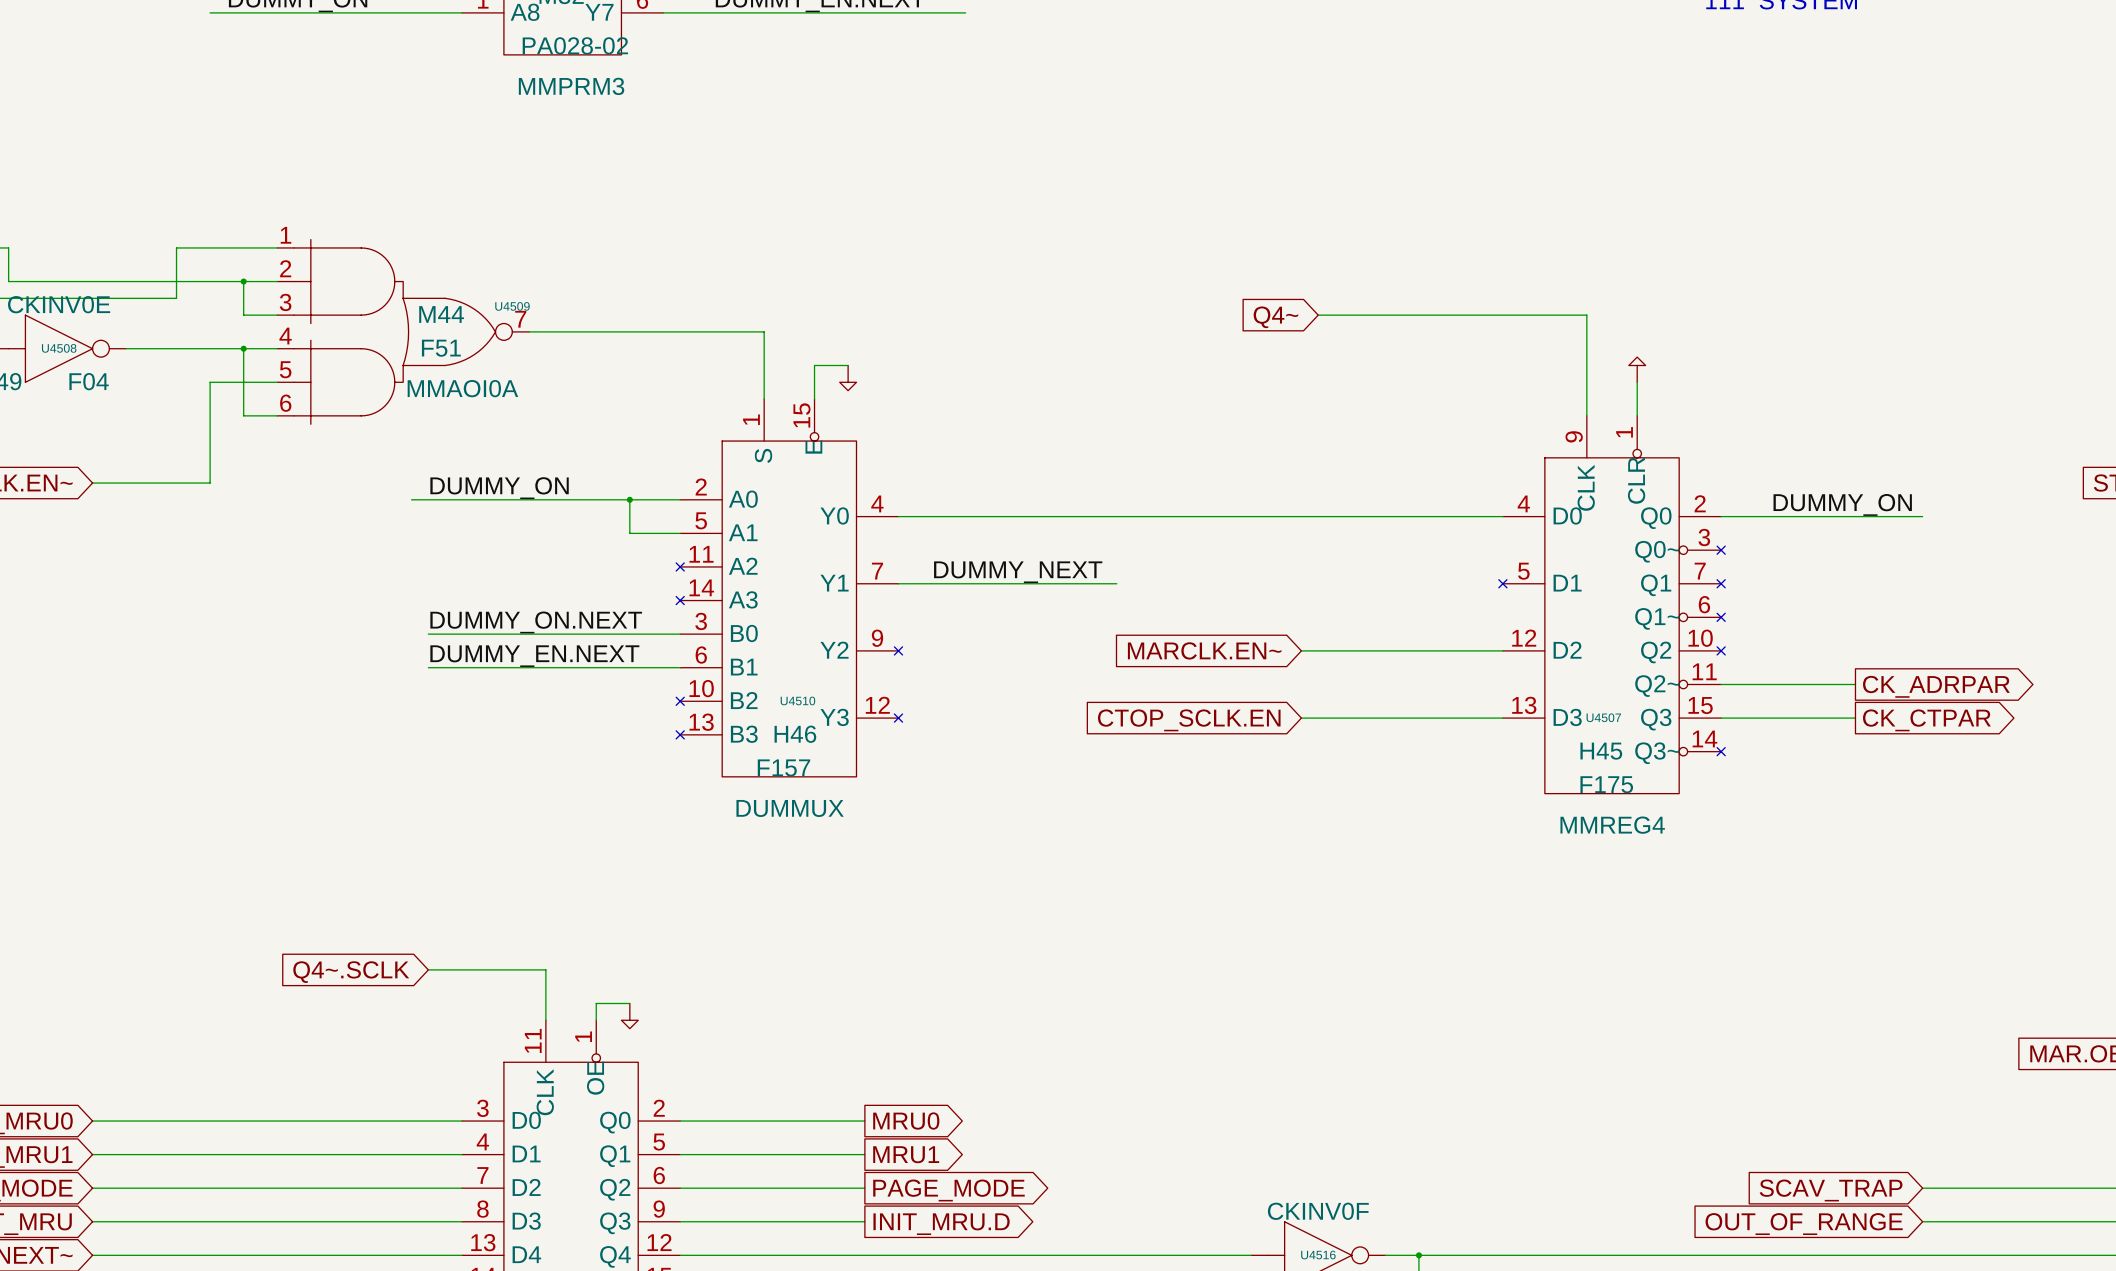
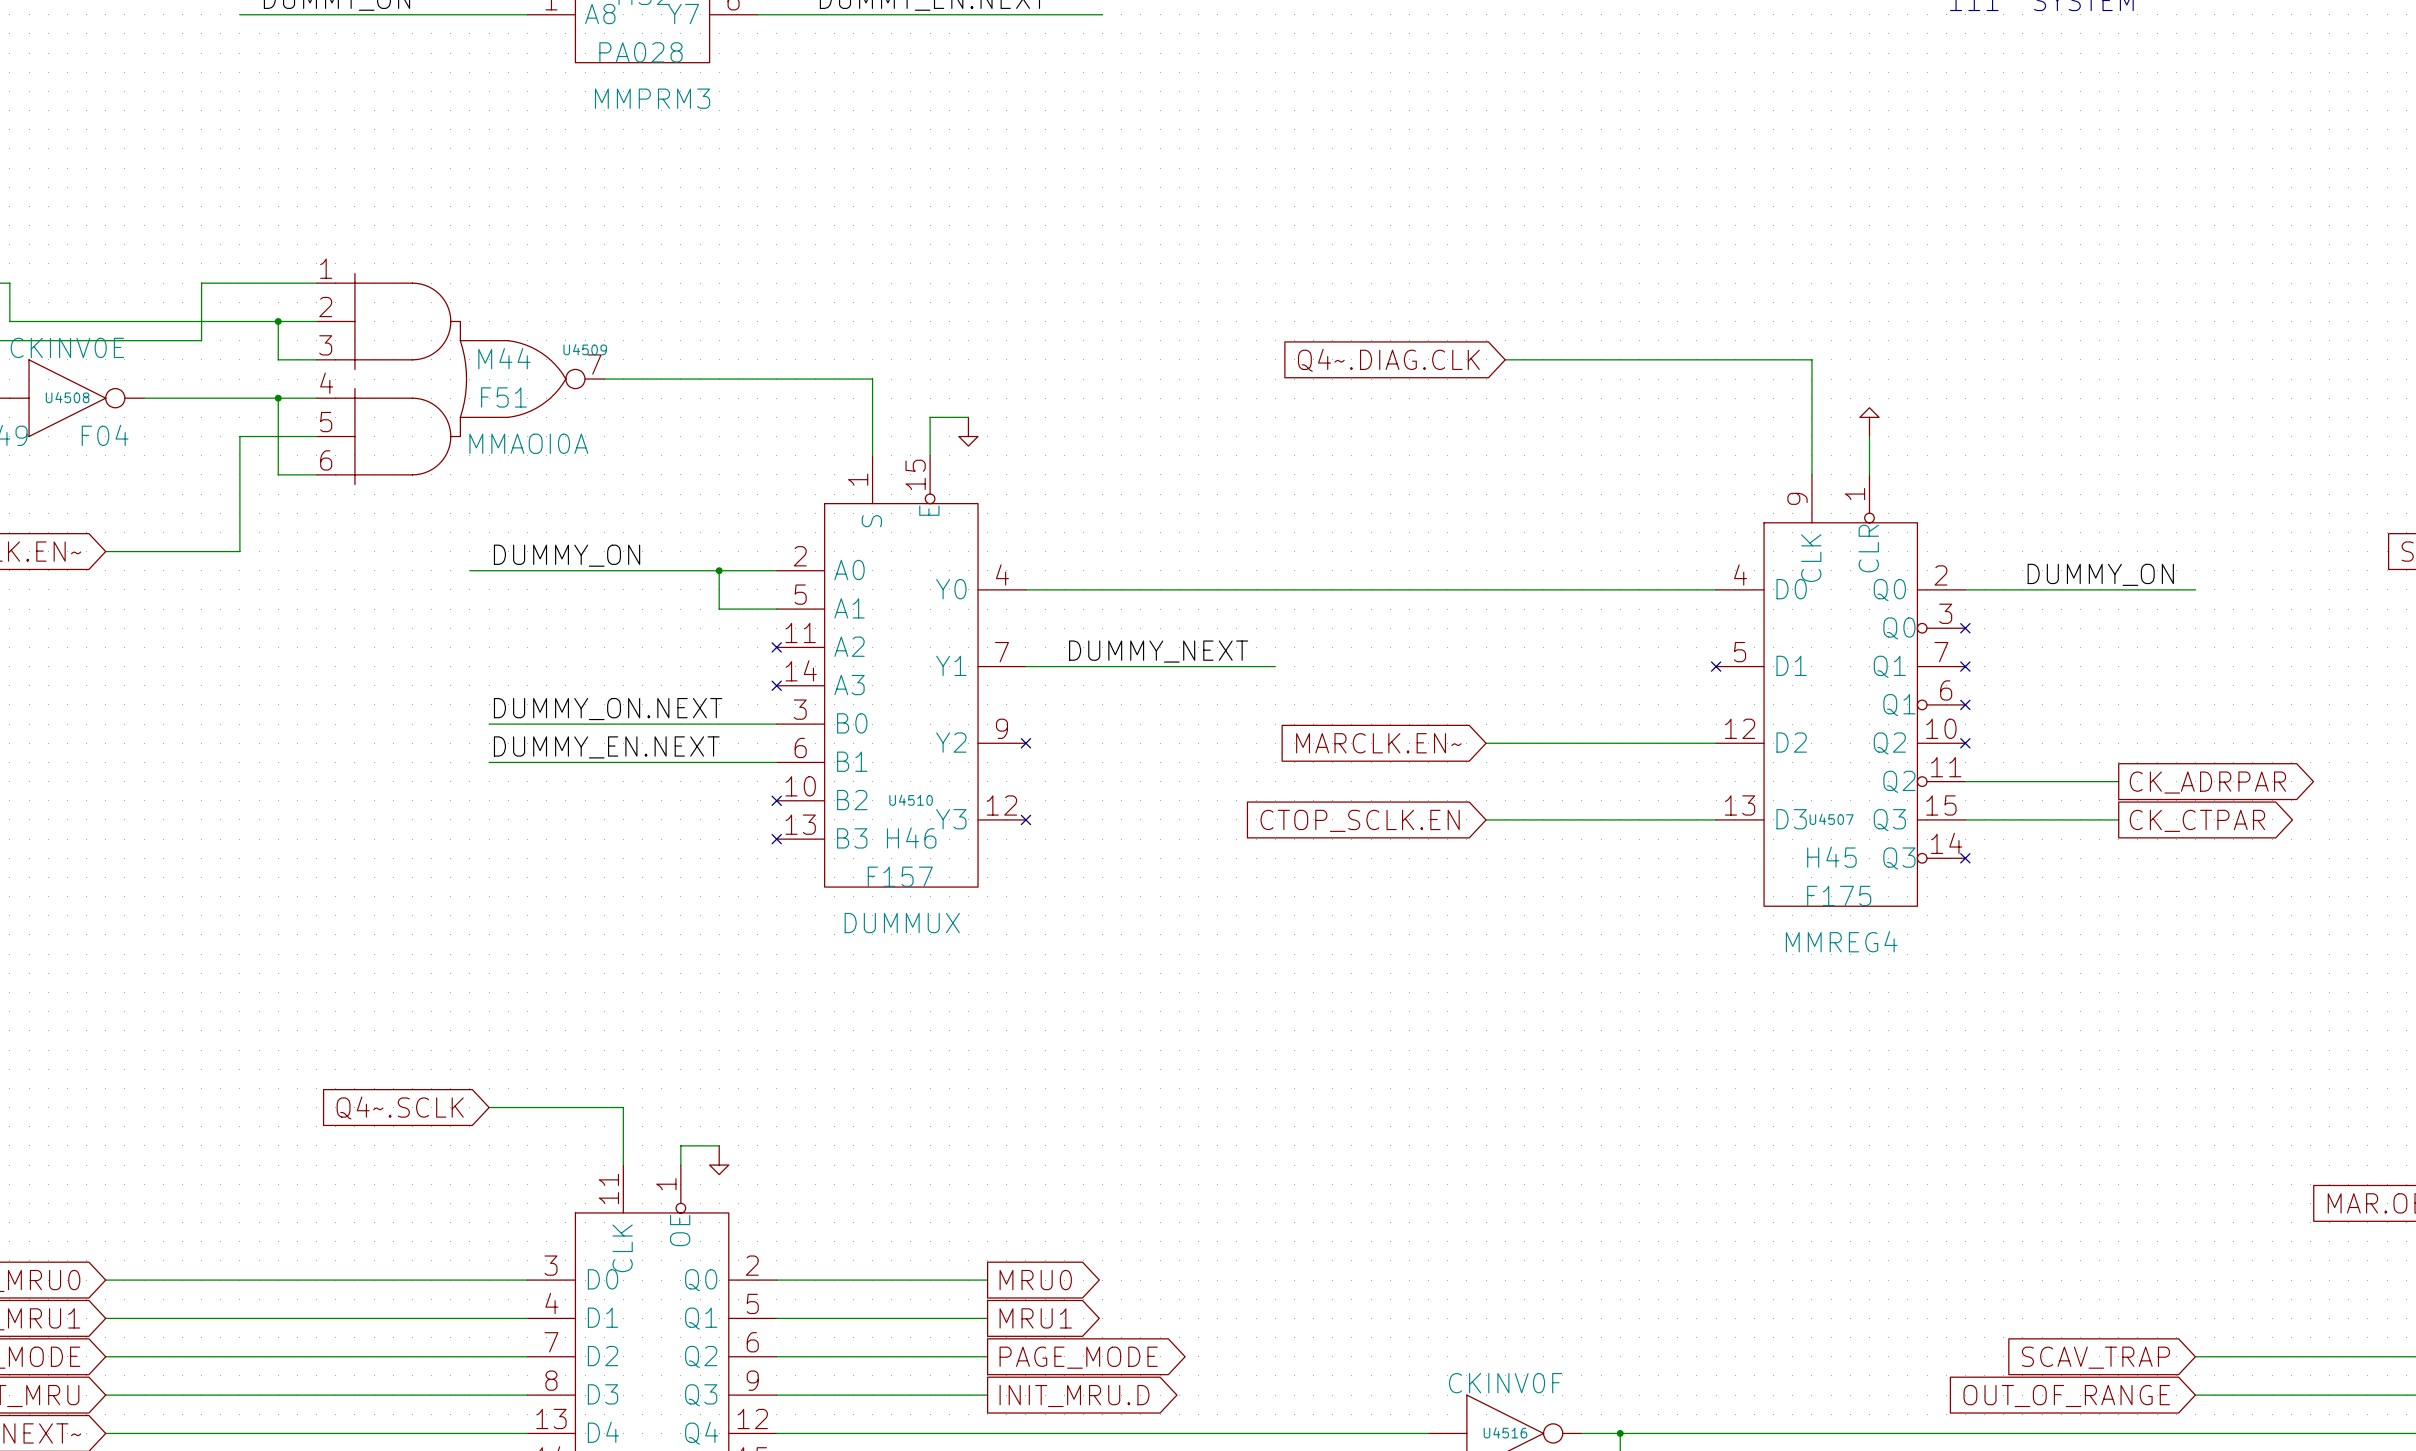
part value: PA028-02 (575, 45) -> PA028 (640, 52)
global label: Q4~ (1275, 317) -> Q4~.DIAG.CLK (1388, 360)
U4507 pin name: Q0~ (1657, 551) -> Q0 (1899, 628)
U4507 pin name: Q1~ (1657, 618) -> Q1 (1899, 705)
U4507 pin name: Q2~ (1657, 686) -> Q2 (1899, 781)
U4507 pin name: Q3~ (1657, 753) -> Q3 (1899, 858)

